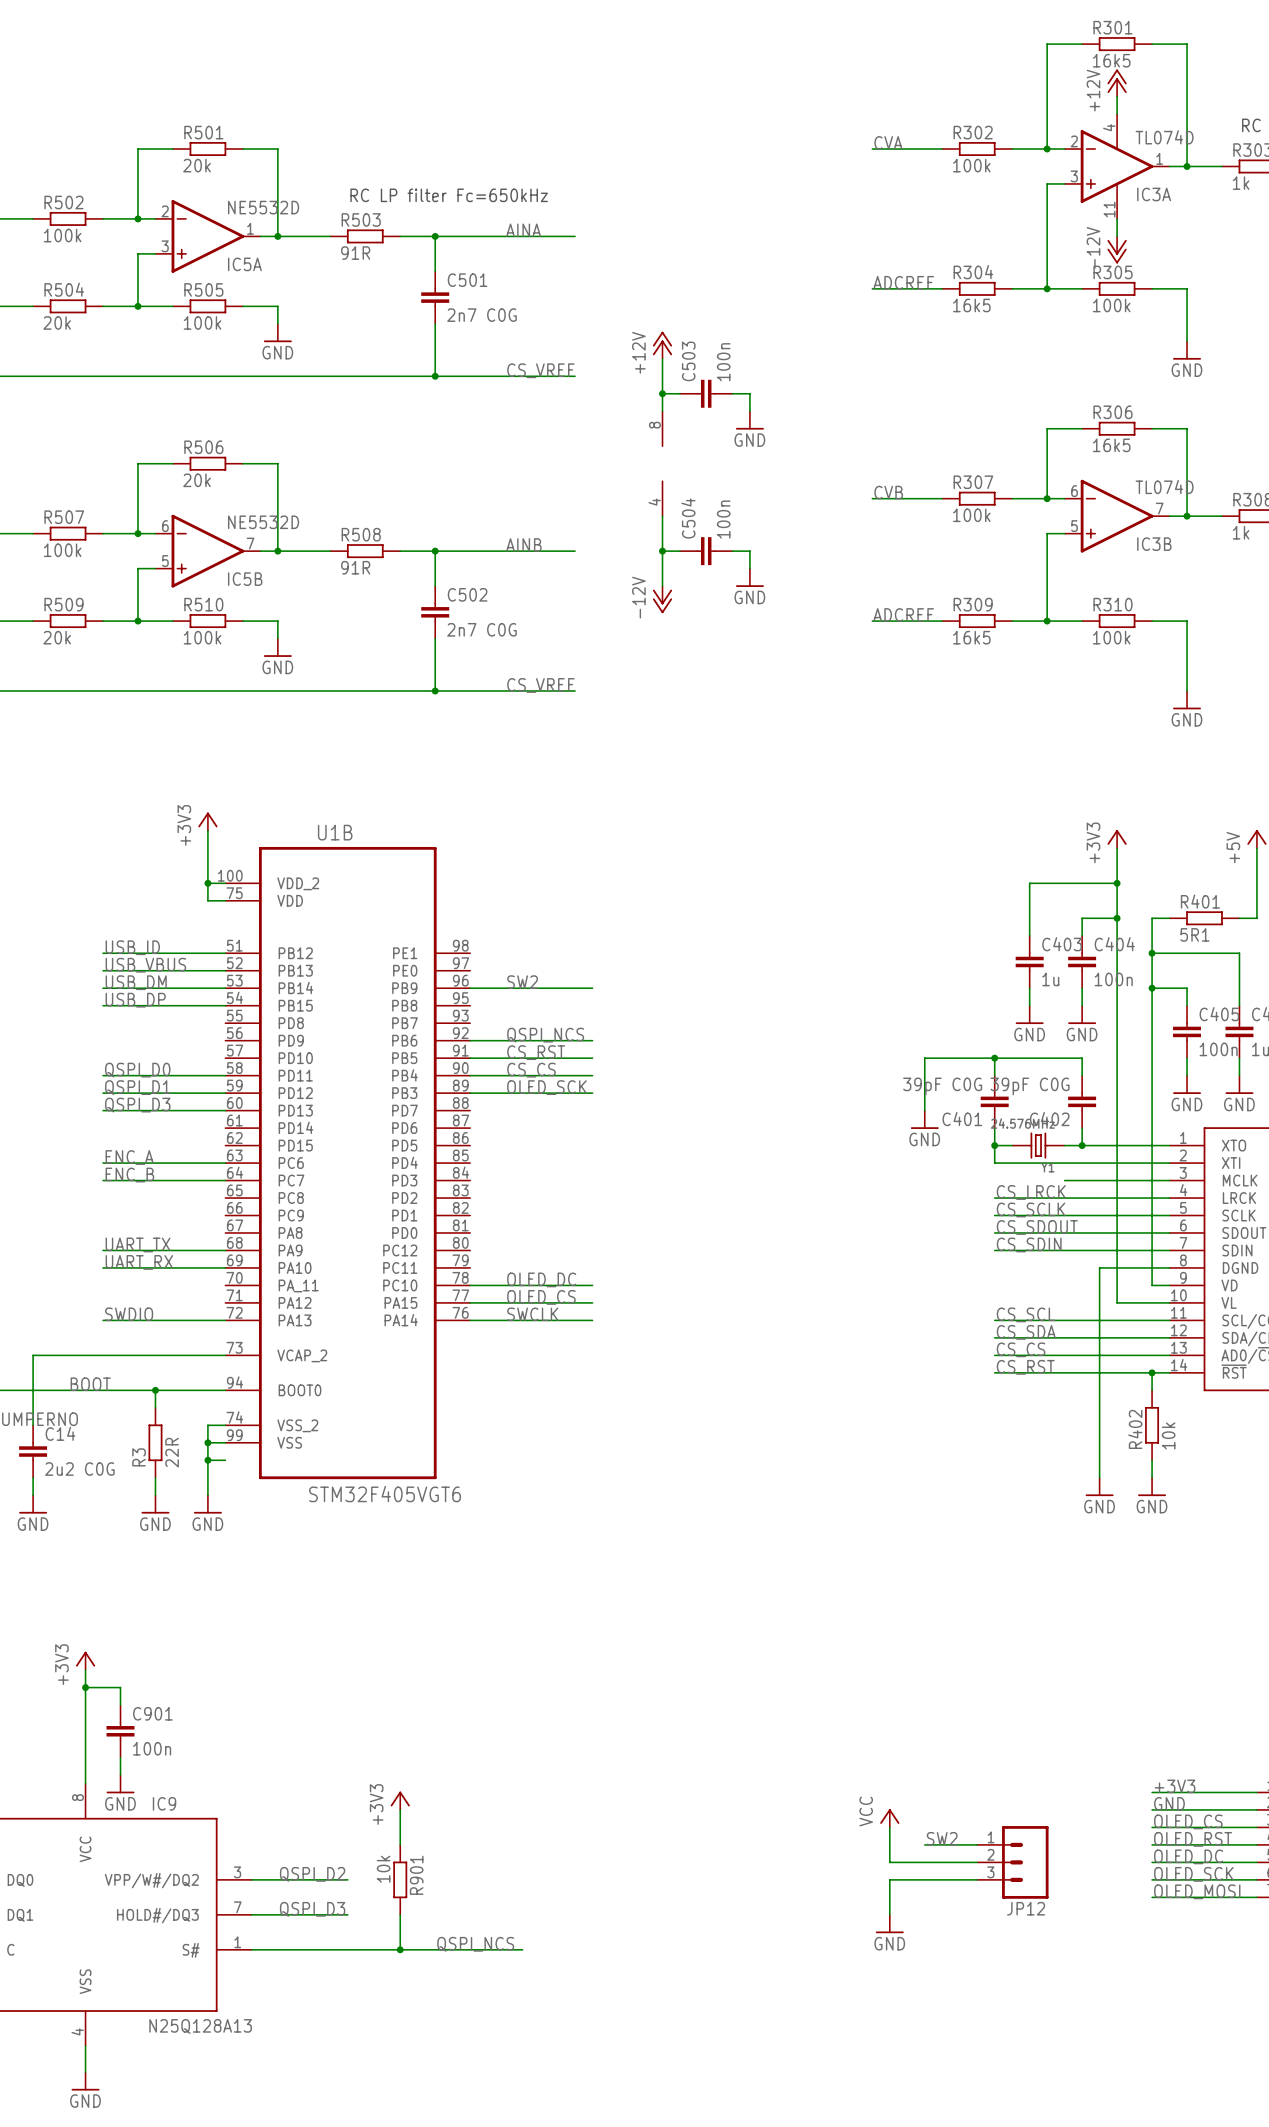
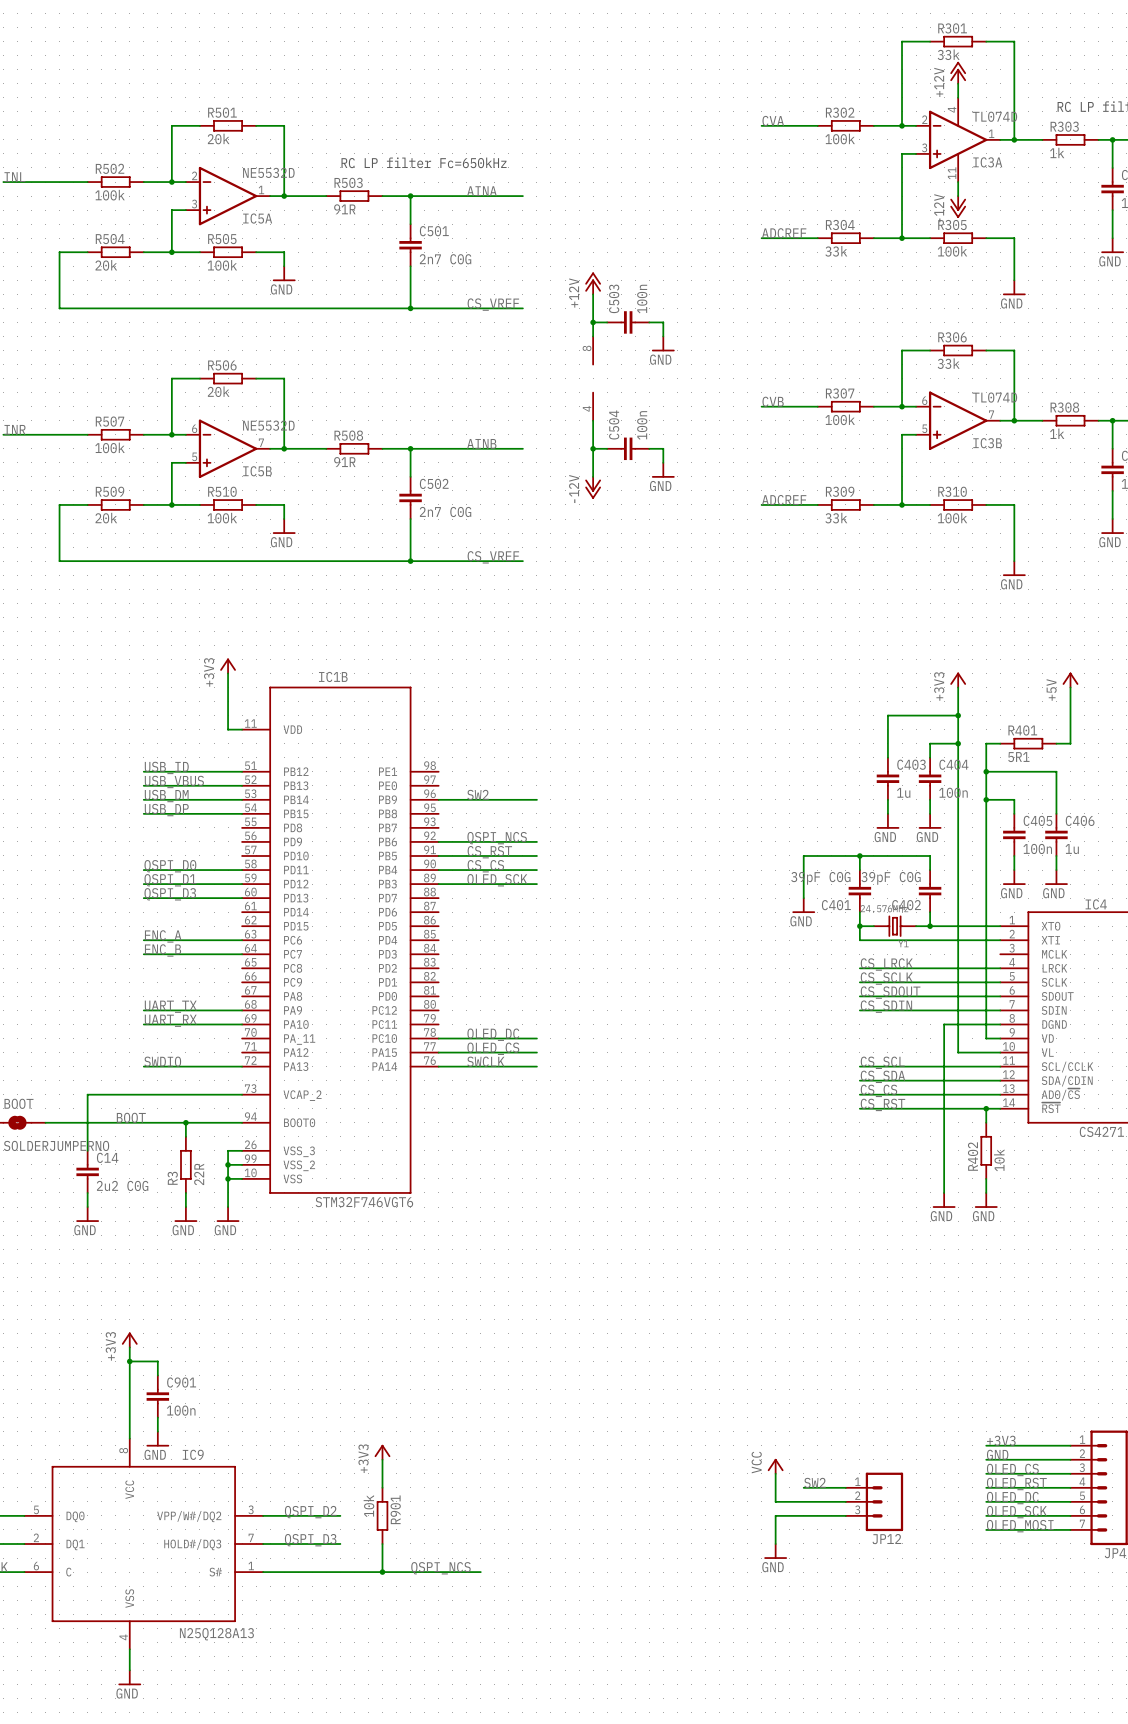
R301 value: 16k5 (1111, 60) -> 33k (948, 54)
R304 value: 16k5 (971, 305) -> 33k (836, 251)
R306 value: 16k5 (1111, 445) -> 33k (948, 363)
R309 value: 16k5 (971, 637) -> 33k (836, 518)
wire: (207, 883) (225, 883) -> none
junction: (207, 883) -> none
U1B: STM32F405VGT6 (347, 1163) -> none
IC1B: none -> STM32F746VGT6 (340, 940)
wire: (1064, 1180) (1169, 1180) -> none

